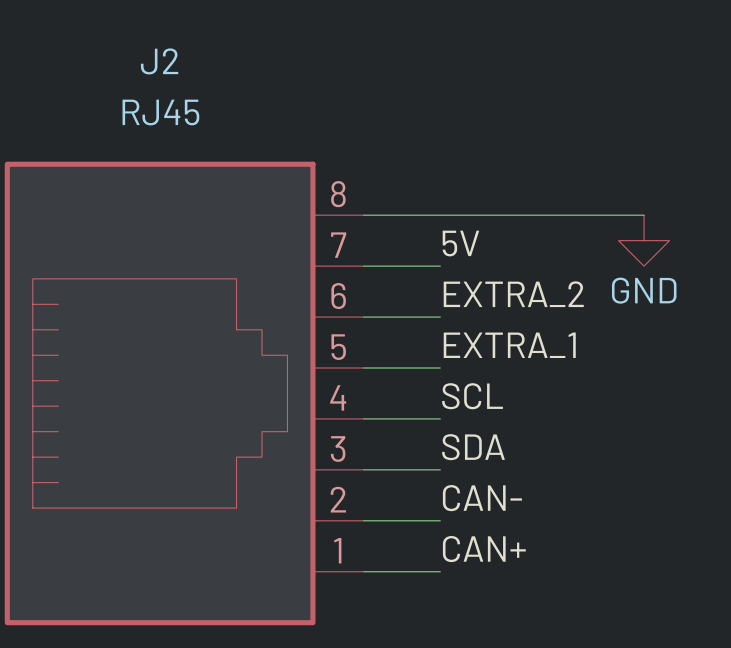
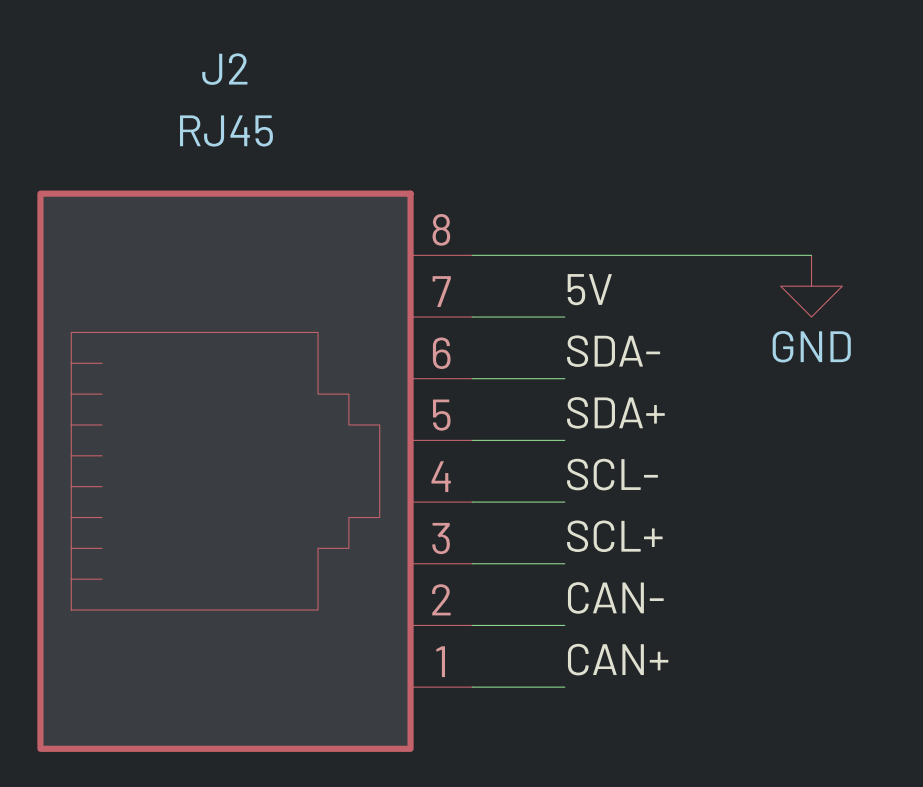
label: EXTRA_2 (513, 294) -> SDA- (613, 351)
label: EXTRA_1 (509, 345) -> SDA+ (615, 412)
label: SCL (472, 396) -> SCL- (612, 474)
label: SDA (473, 447) -> SCL+ (614, 536)

